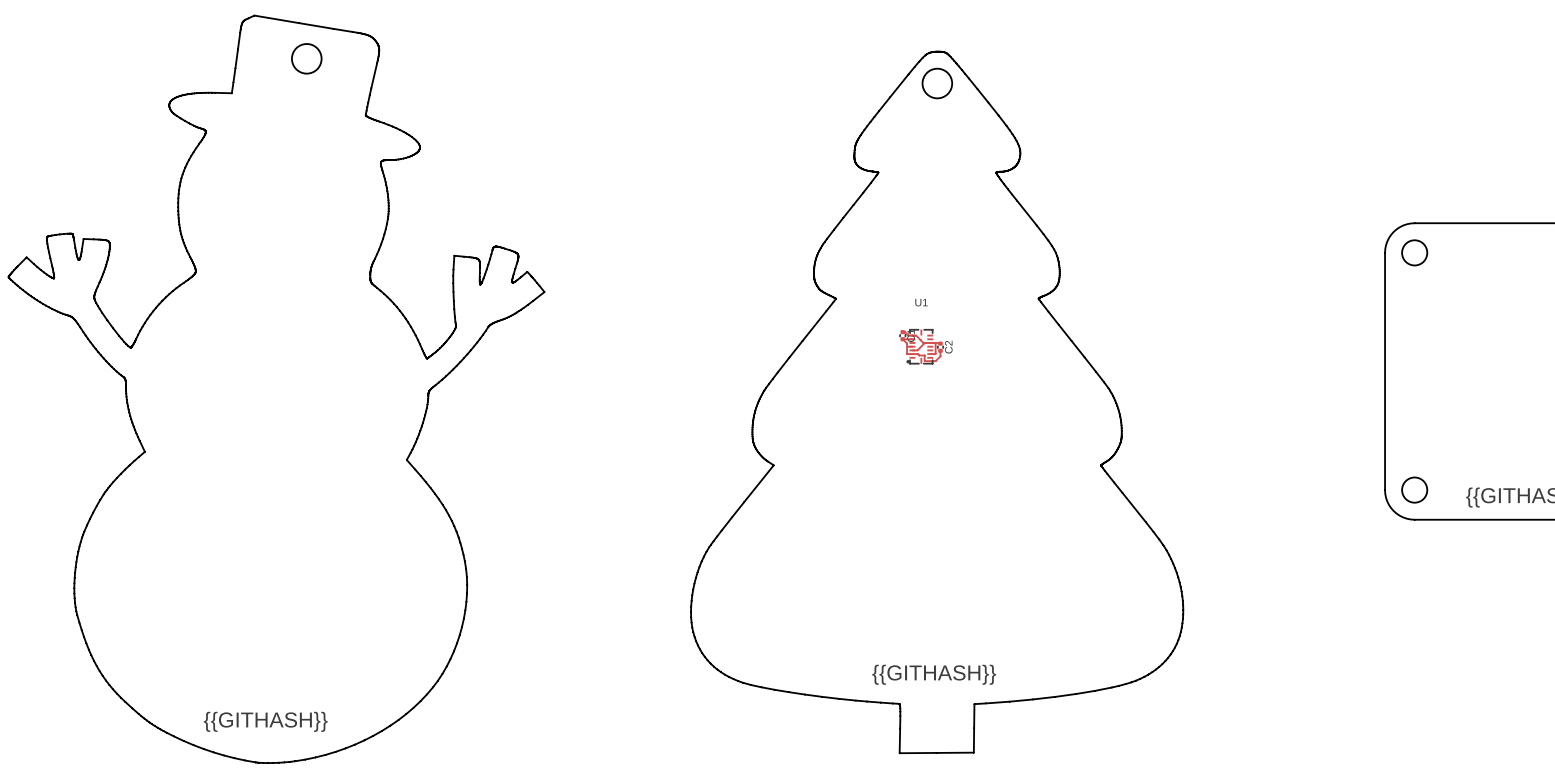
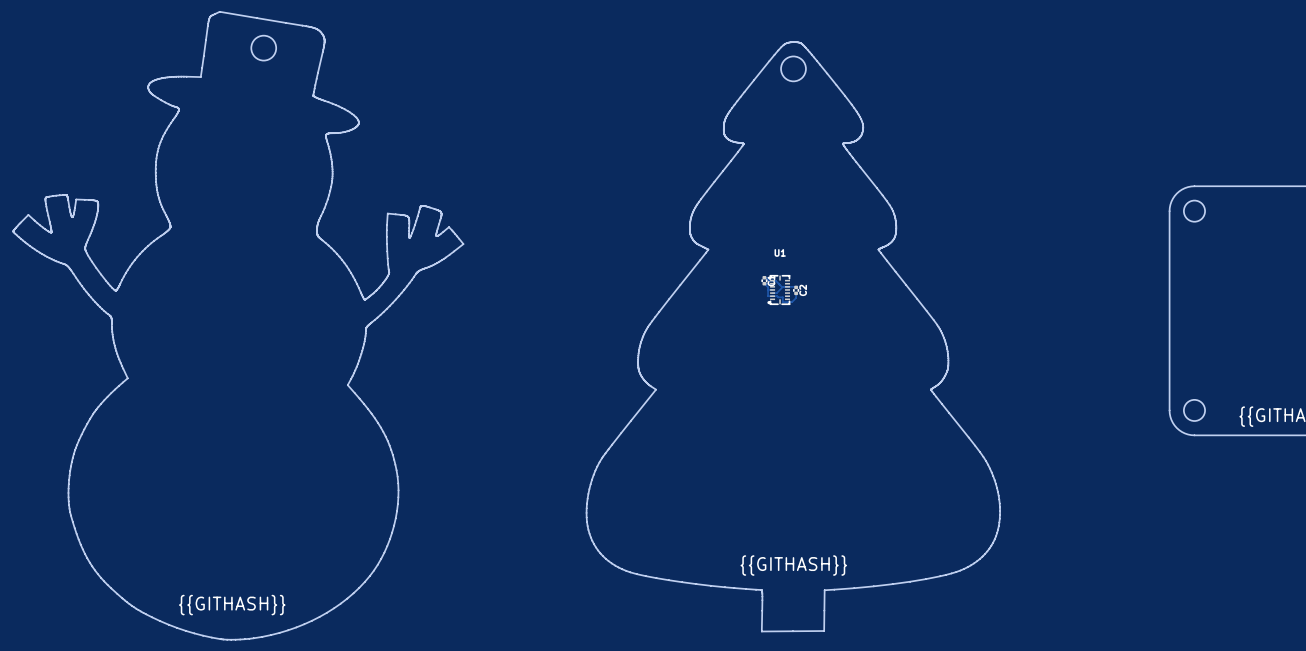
track: (935, 342) (935, 353) (930, 354) -> none

